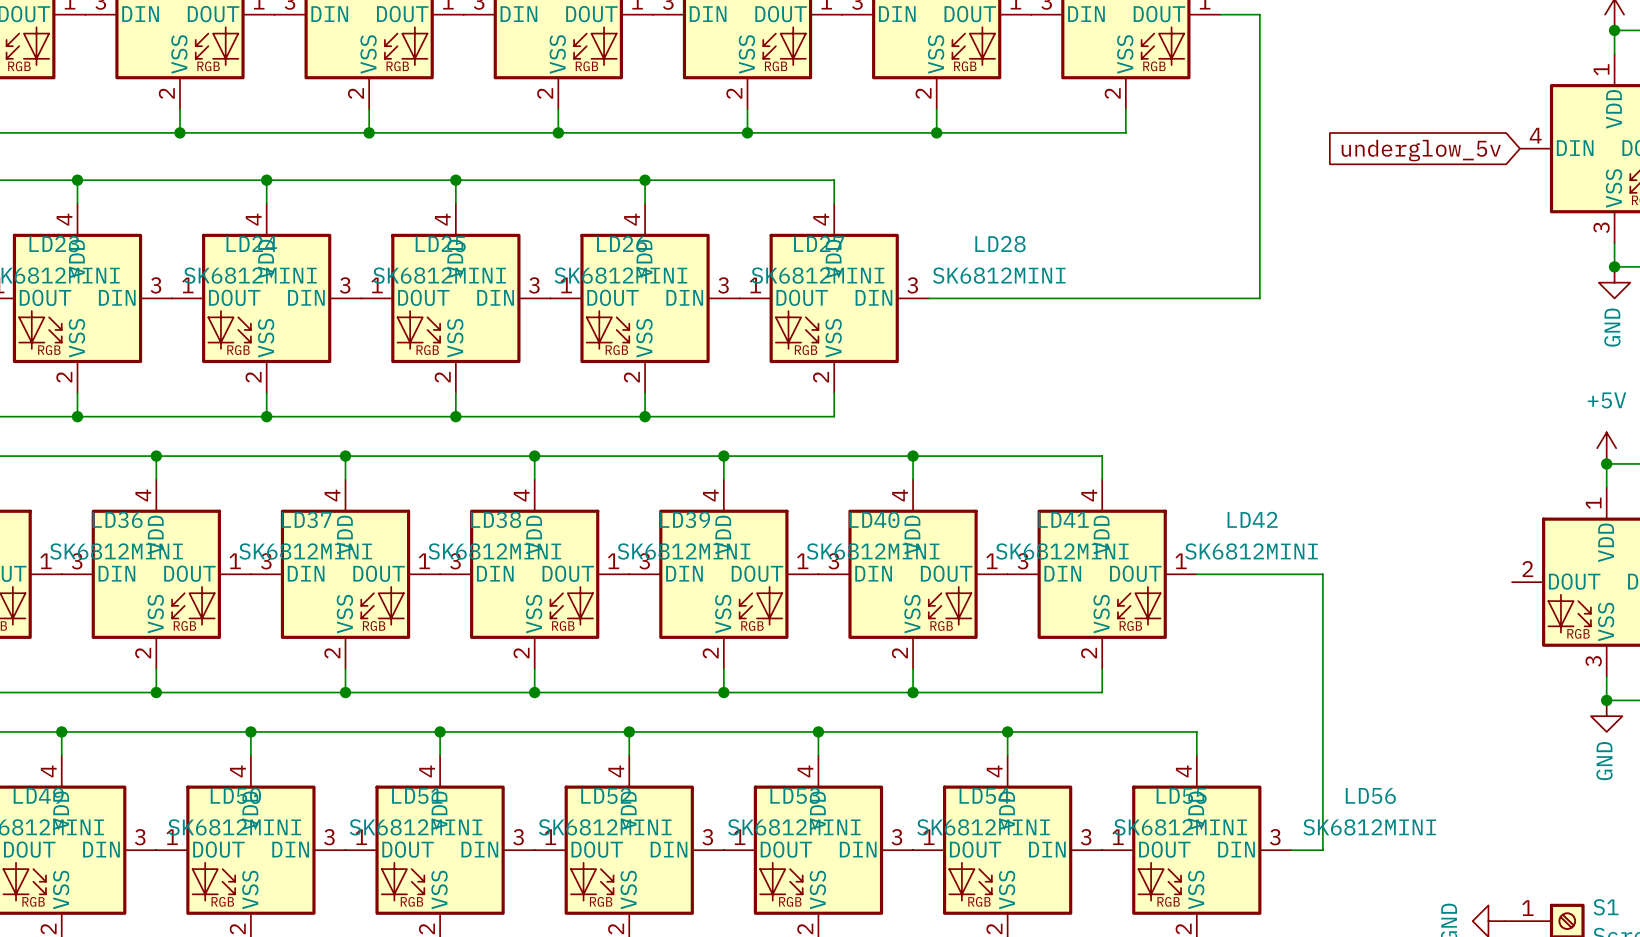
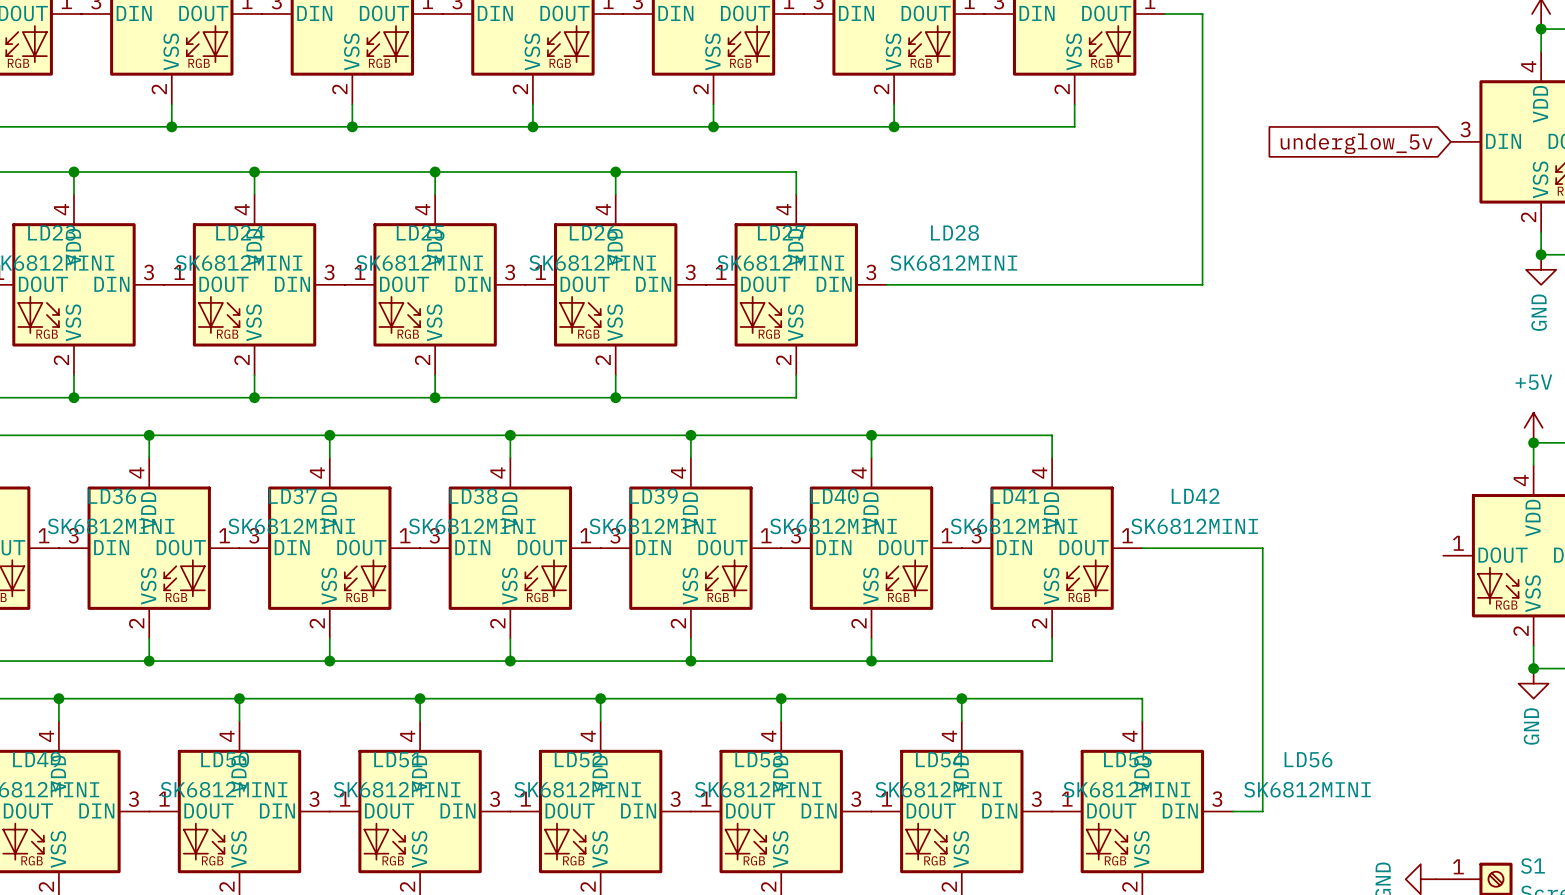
part pin number: 1 (1601, 69) -> 4 (1528, 66)
part pin number: 4 (1535, 135) -> 3 (1465, 129)
part pin number: 3 (1601, 227) -> 2 (1528, 217)
part pin number: 1 (1593, 503) -> 4 (1521, 480)
part pin number: 2 (1527, 569) -> 1 (1458, 543)
part pin number: 3 (1593, 661) -> 2 (1521, 630)

